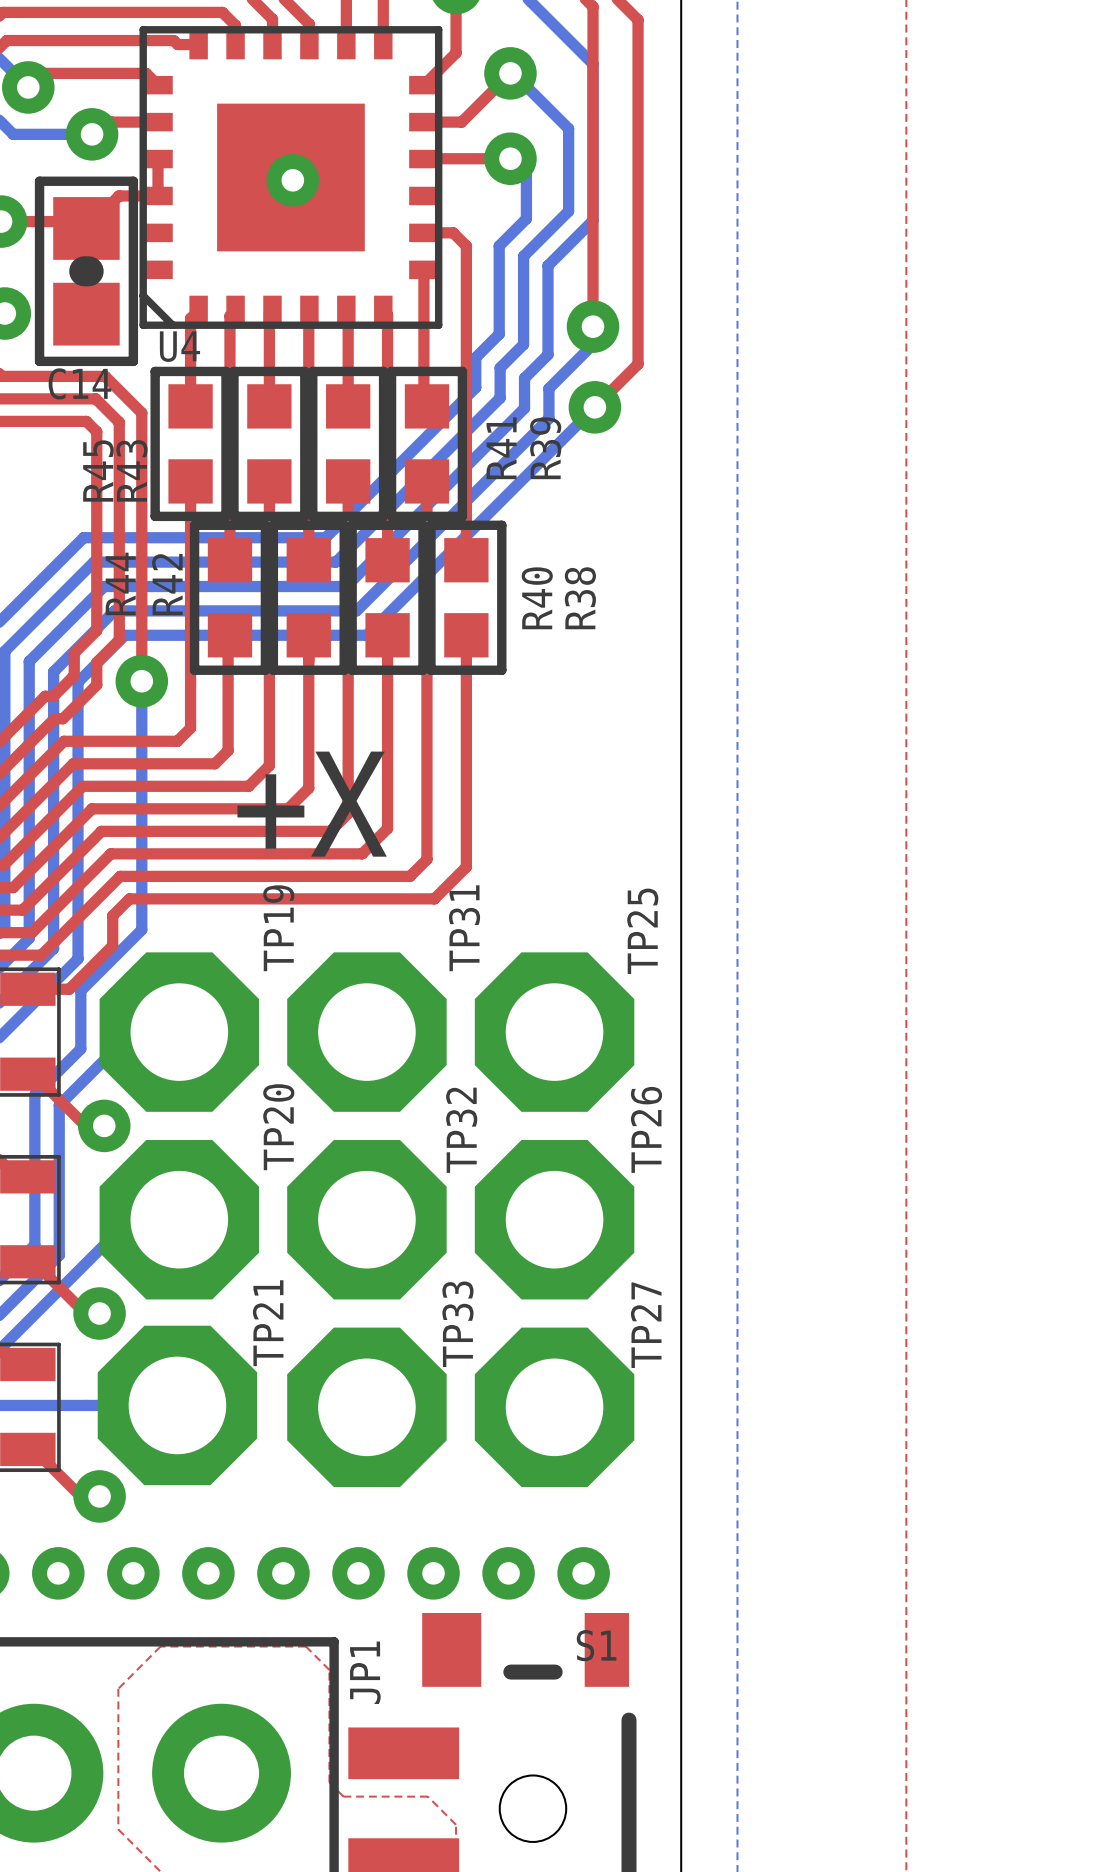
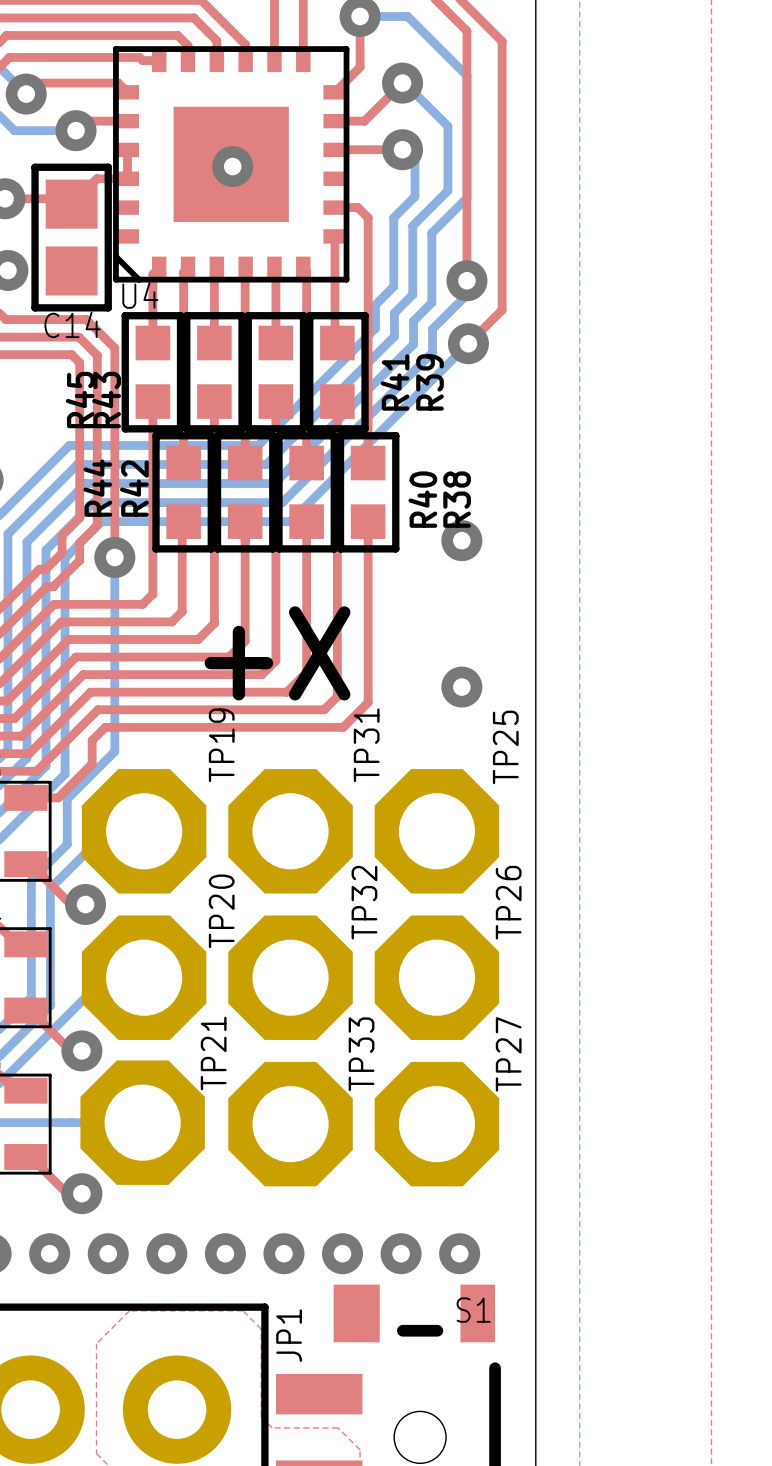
C14 footprint: [34, 176, 139, 367] -> [31, 163, 112, 312]
via: none -> (461, 540)
via: none -> (461, 687)

